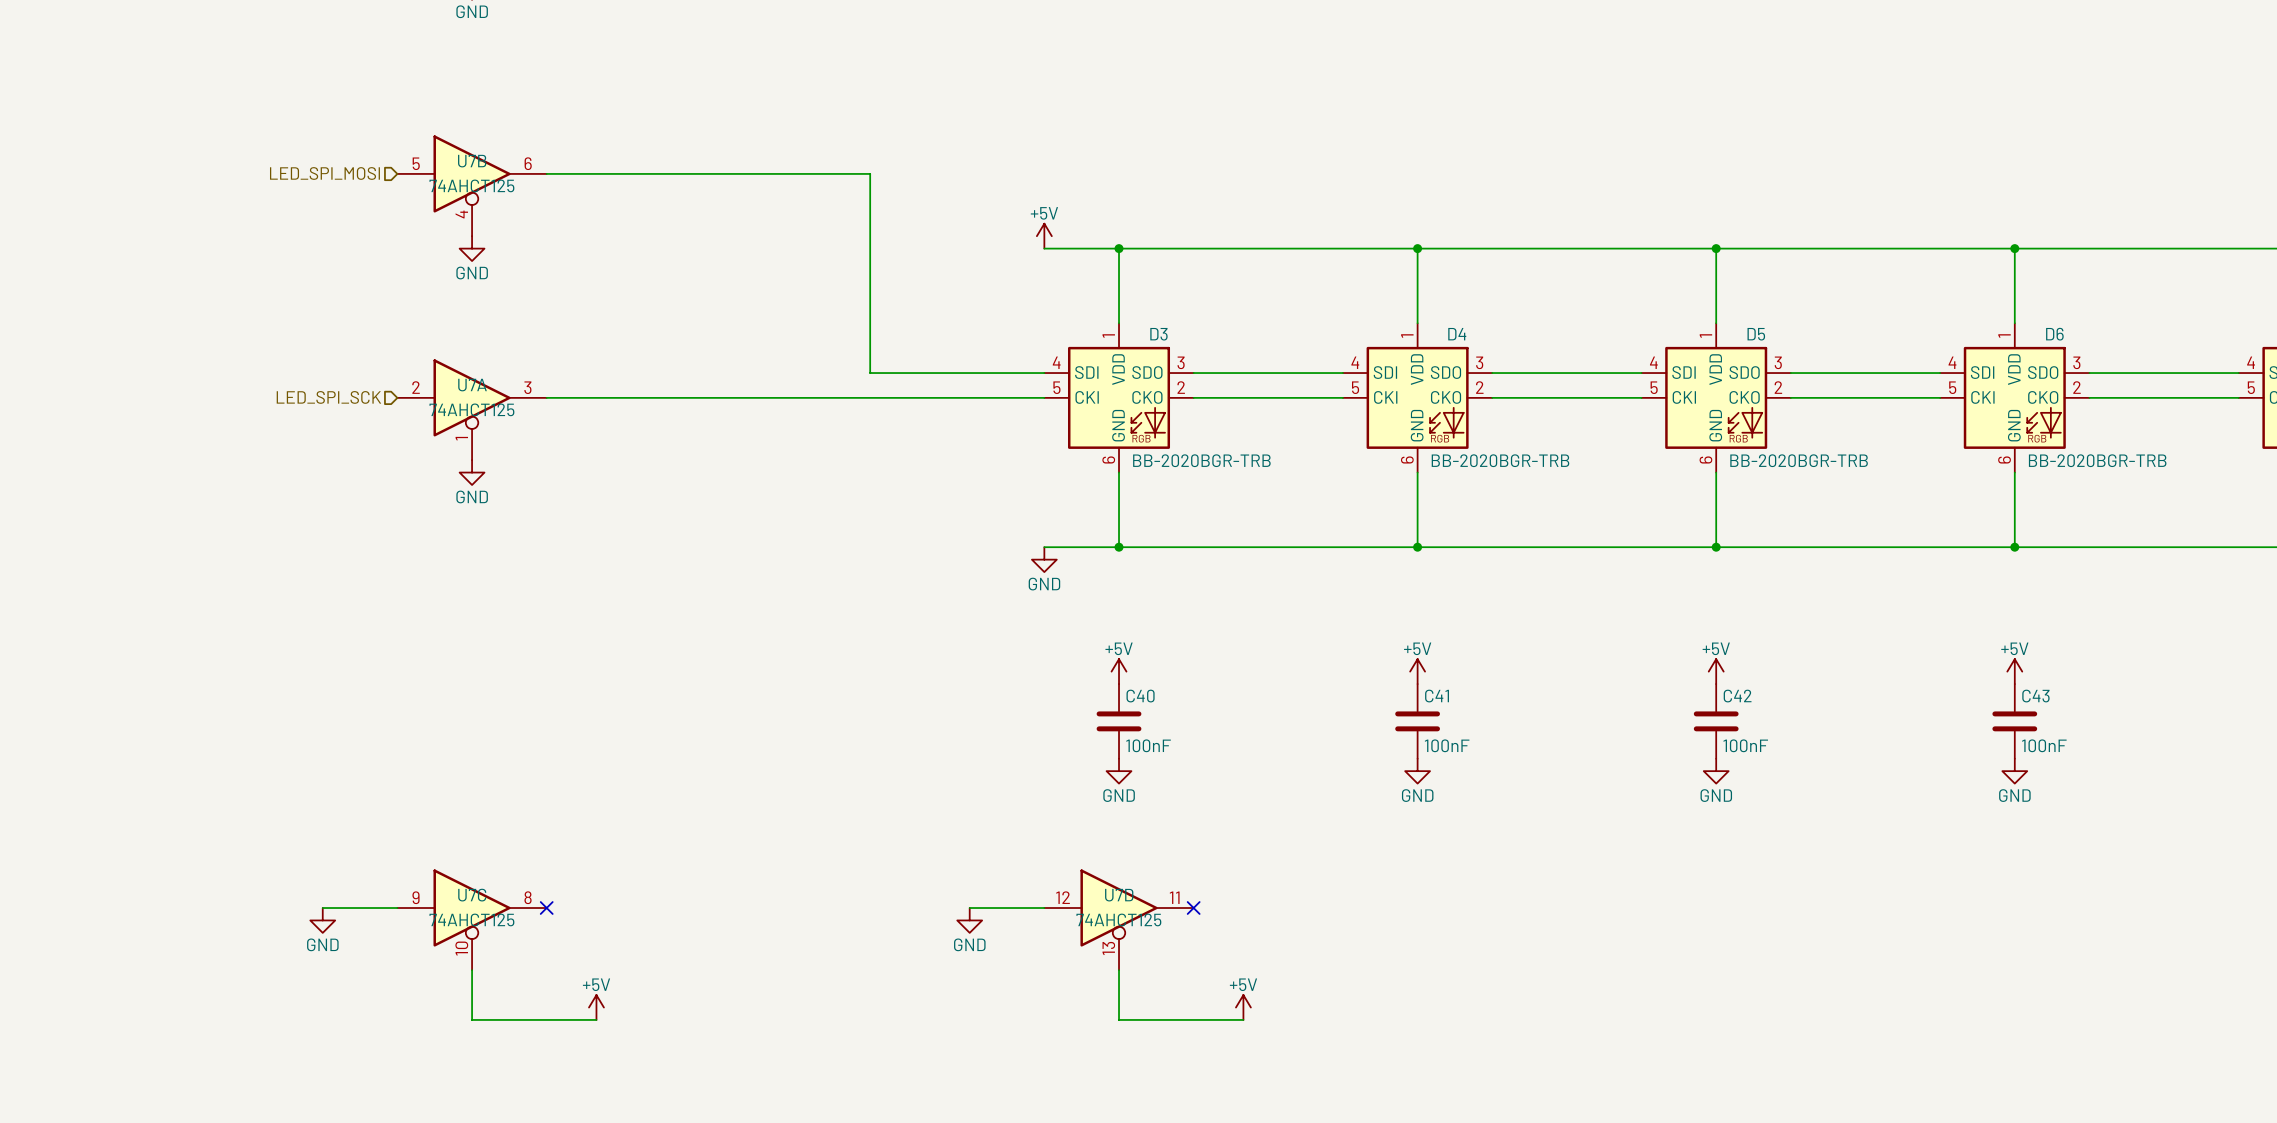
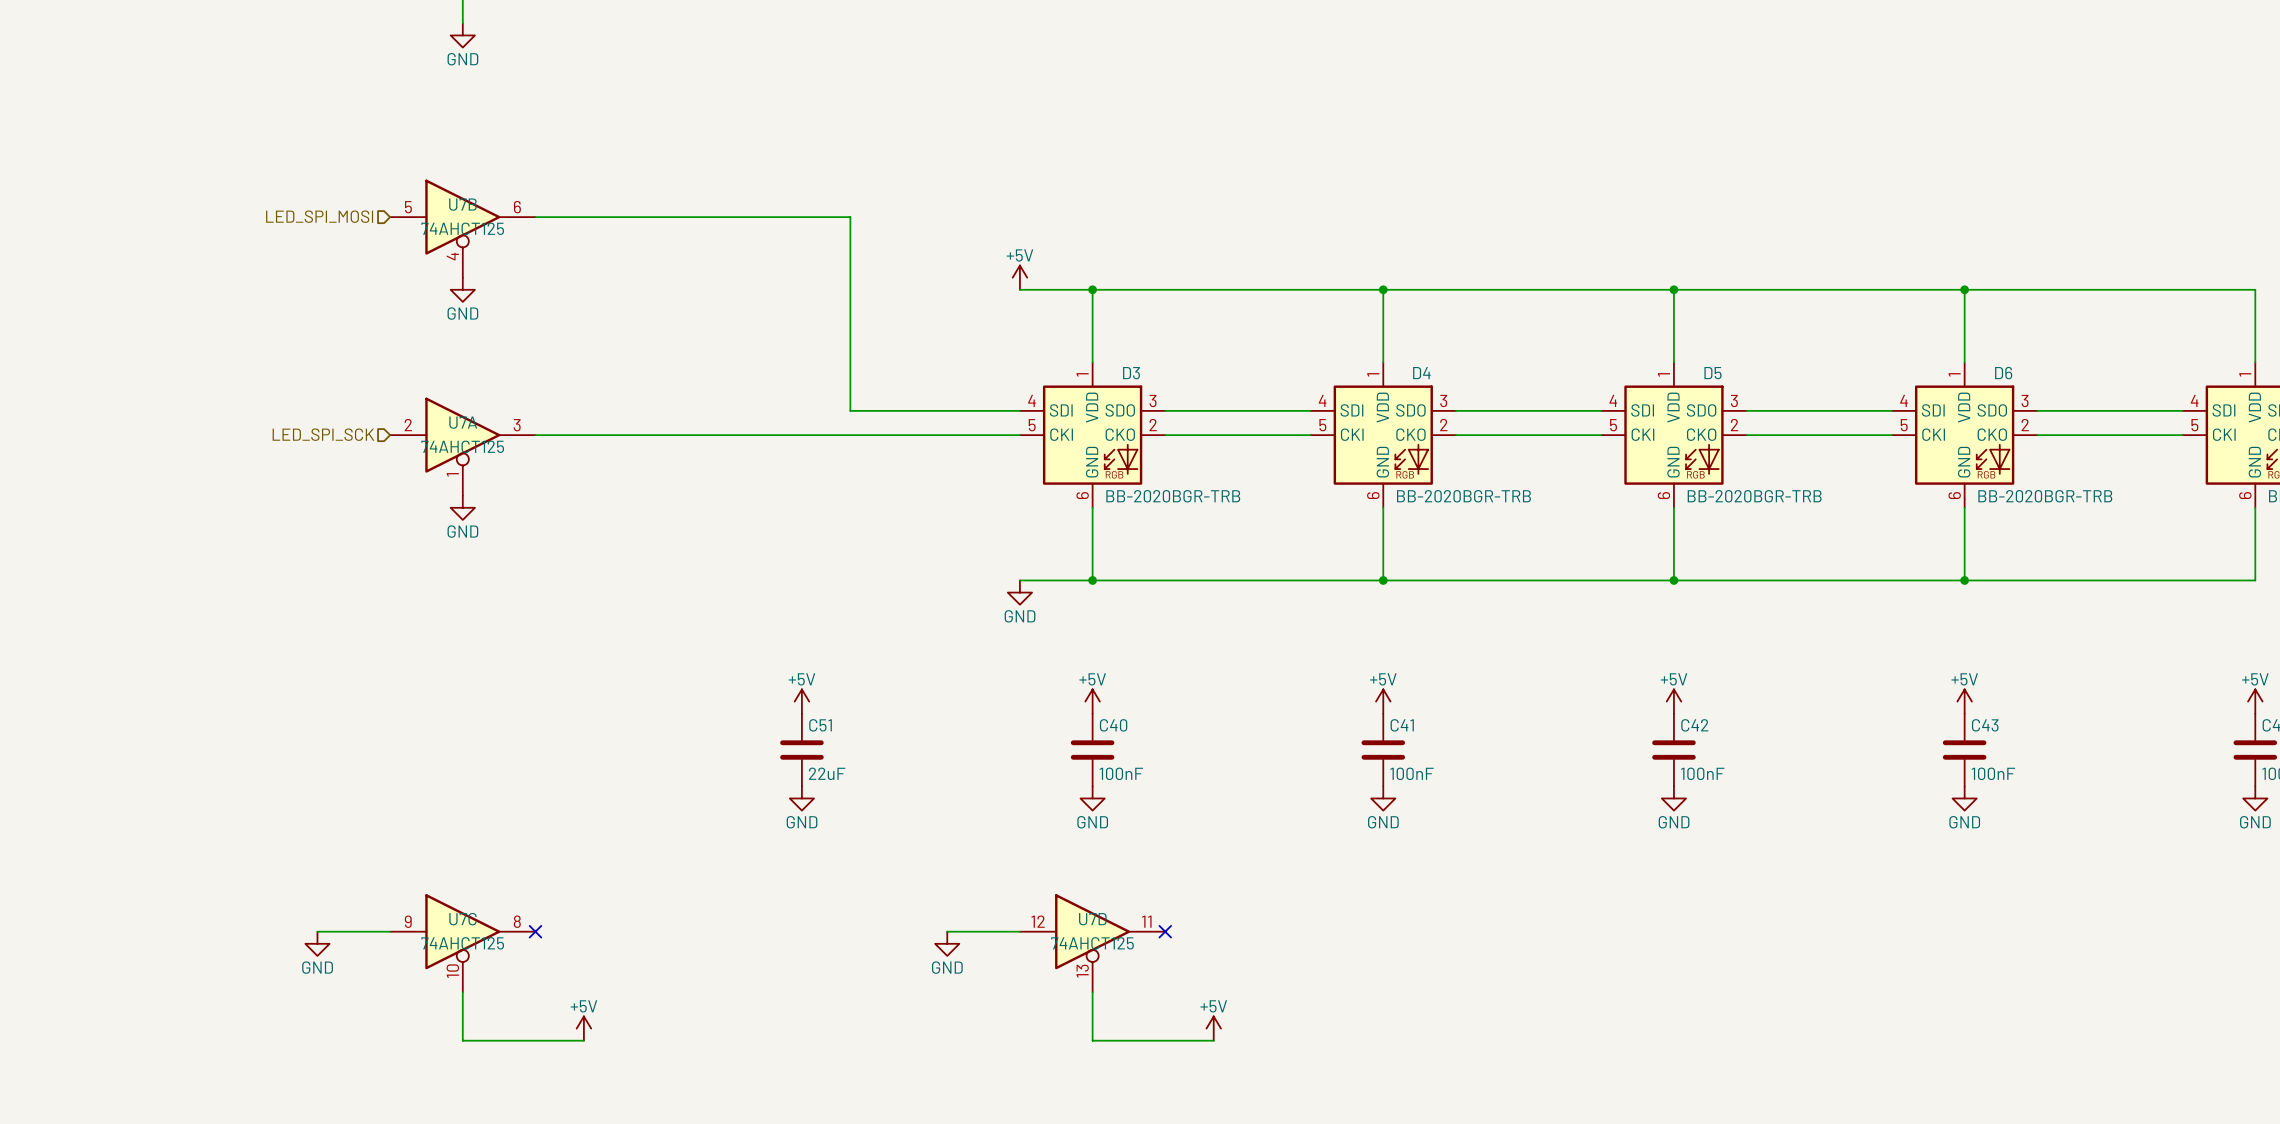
power symbol: none -> +5V (801, 701)
C51: none -> 22uF (801, 750)
power symbol: none -> GND (801, 798)

